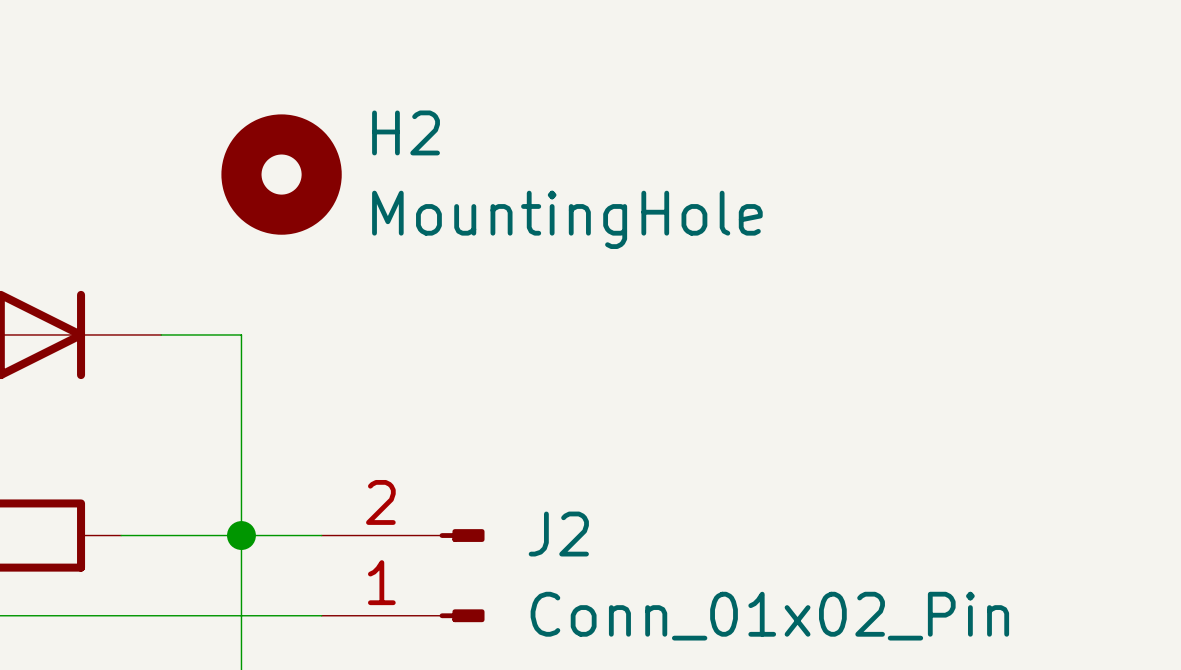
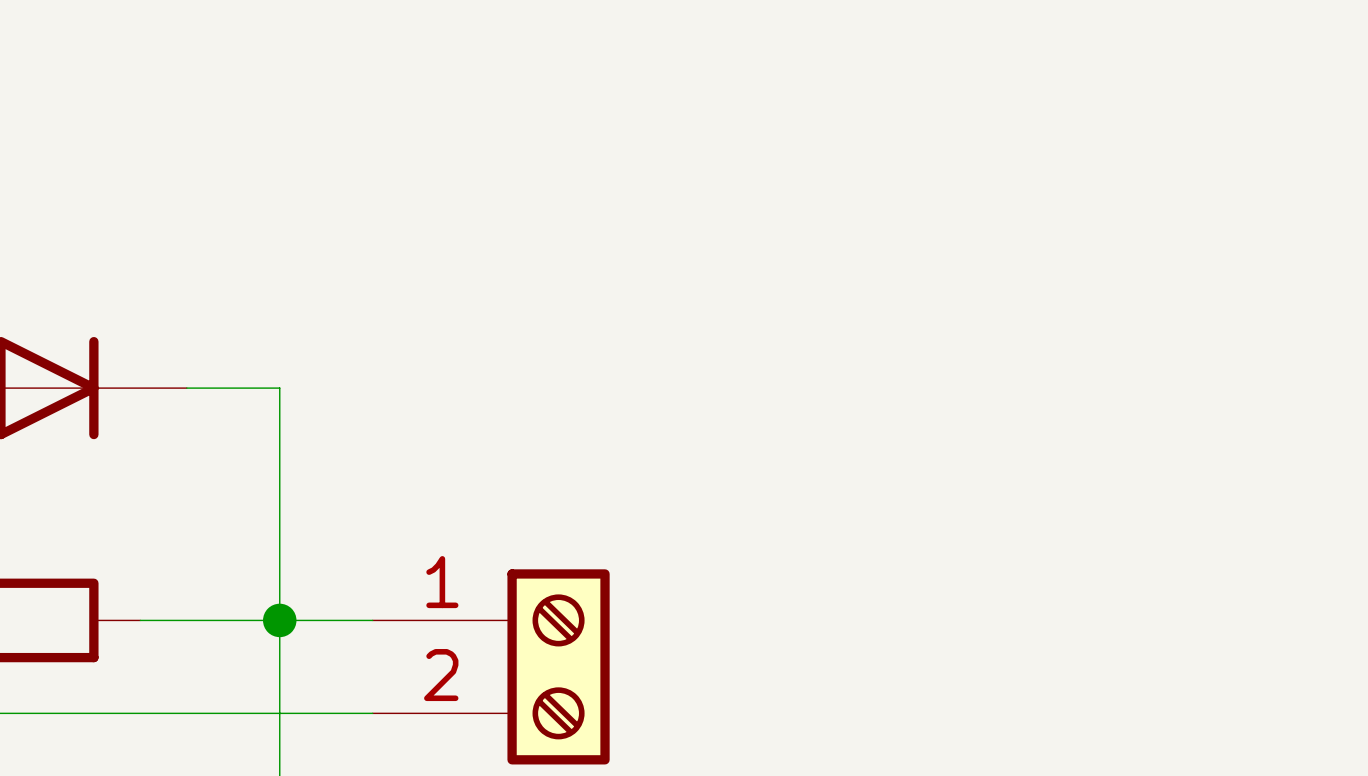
H2: MountingHole (281, 174) -> none
J2: Conn_01x02_Pin (403, 575) -> none
part: none -> (491, 666)

